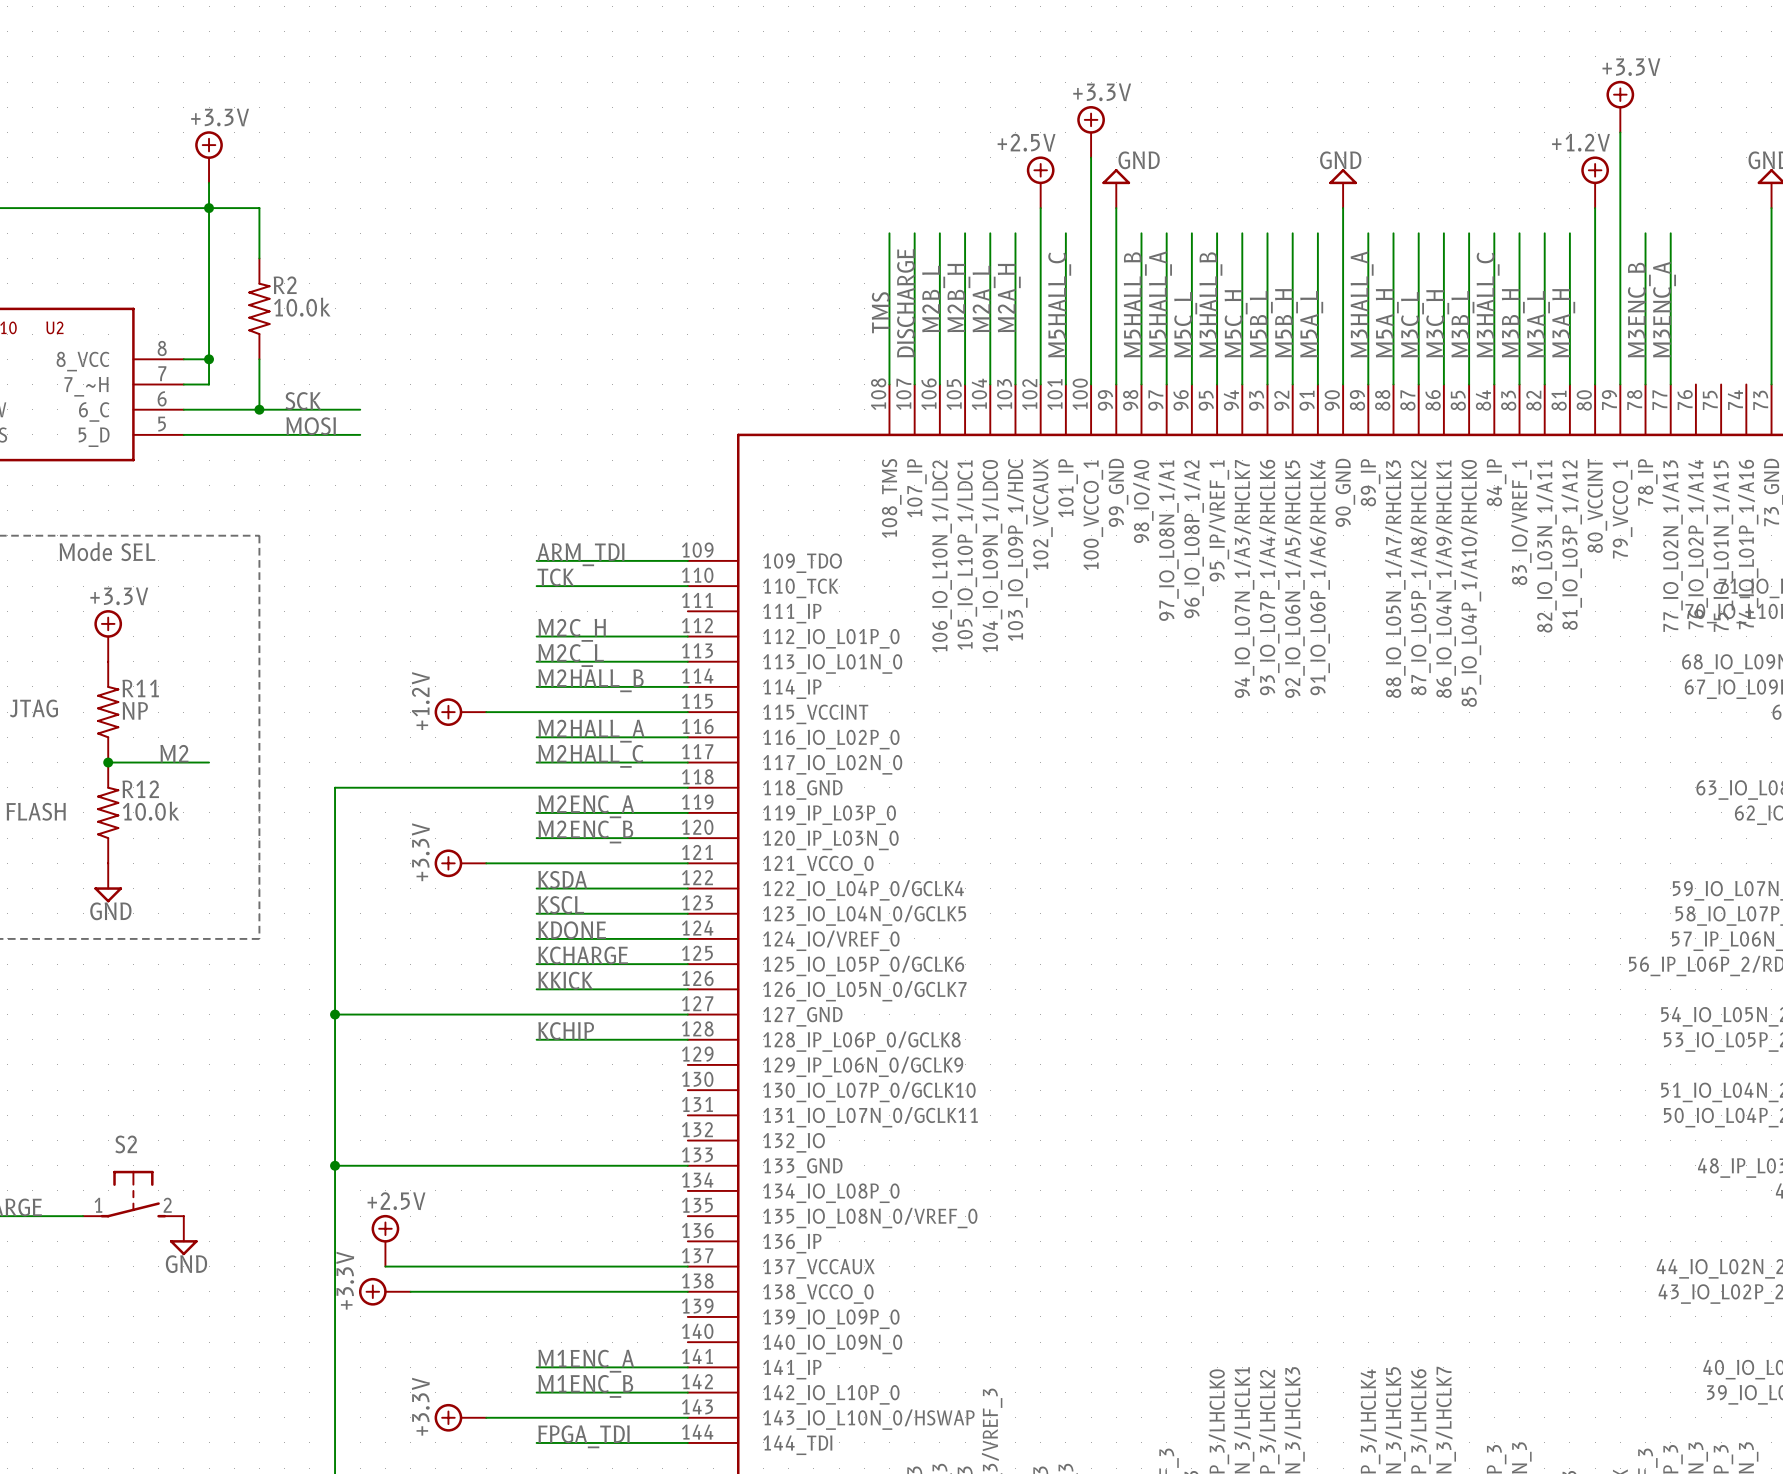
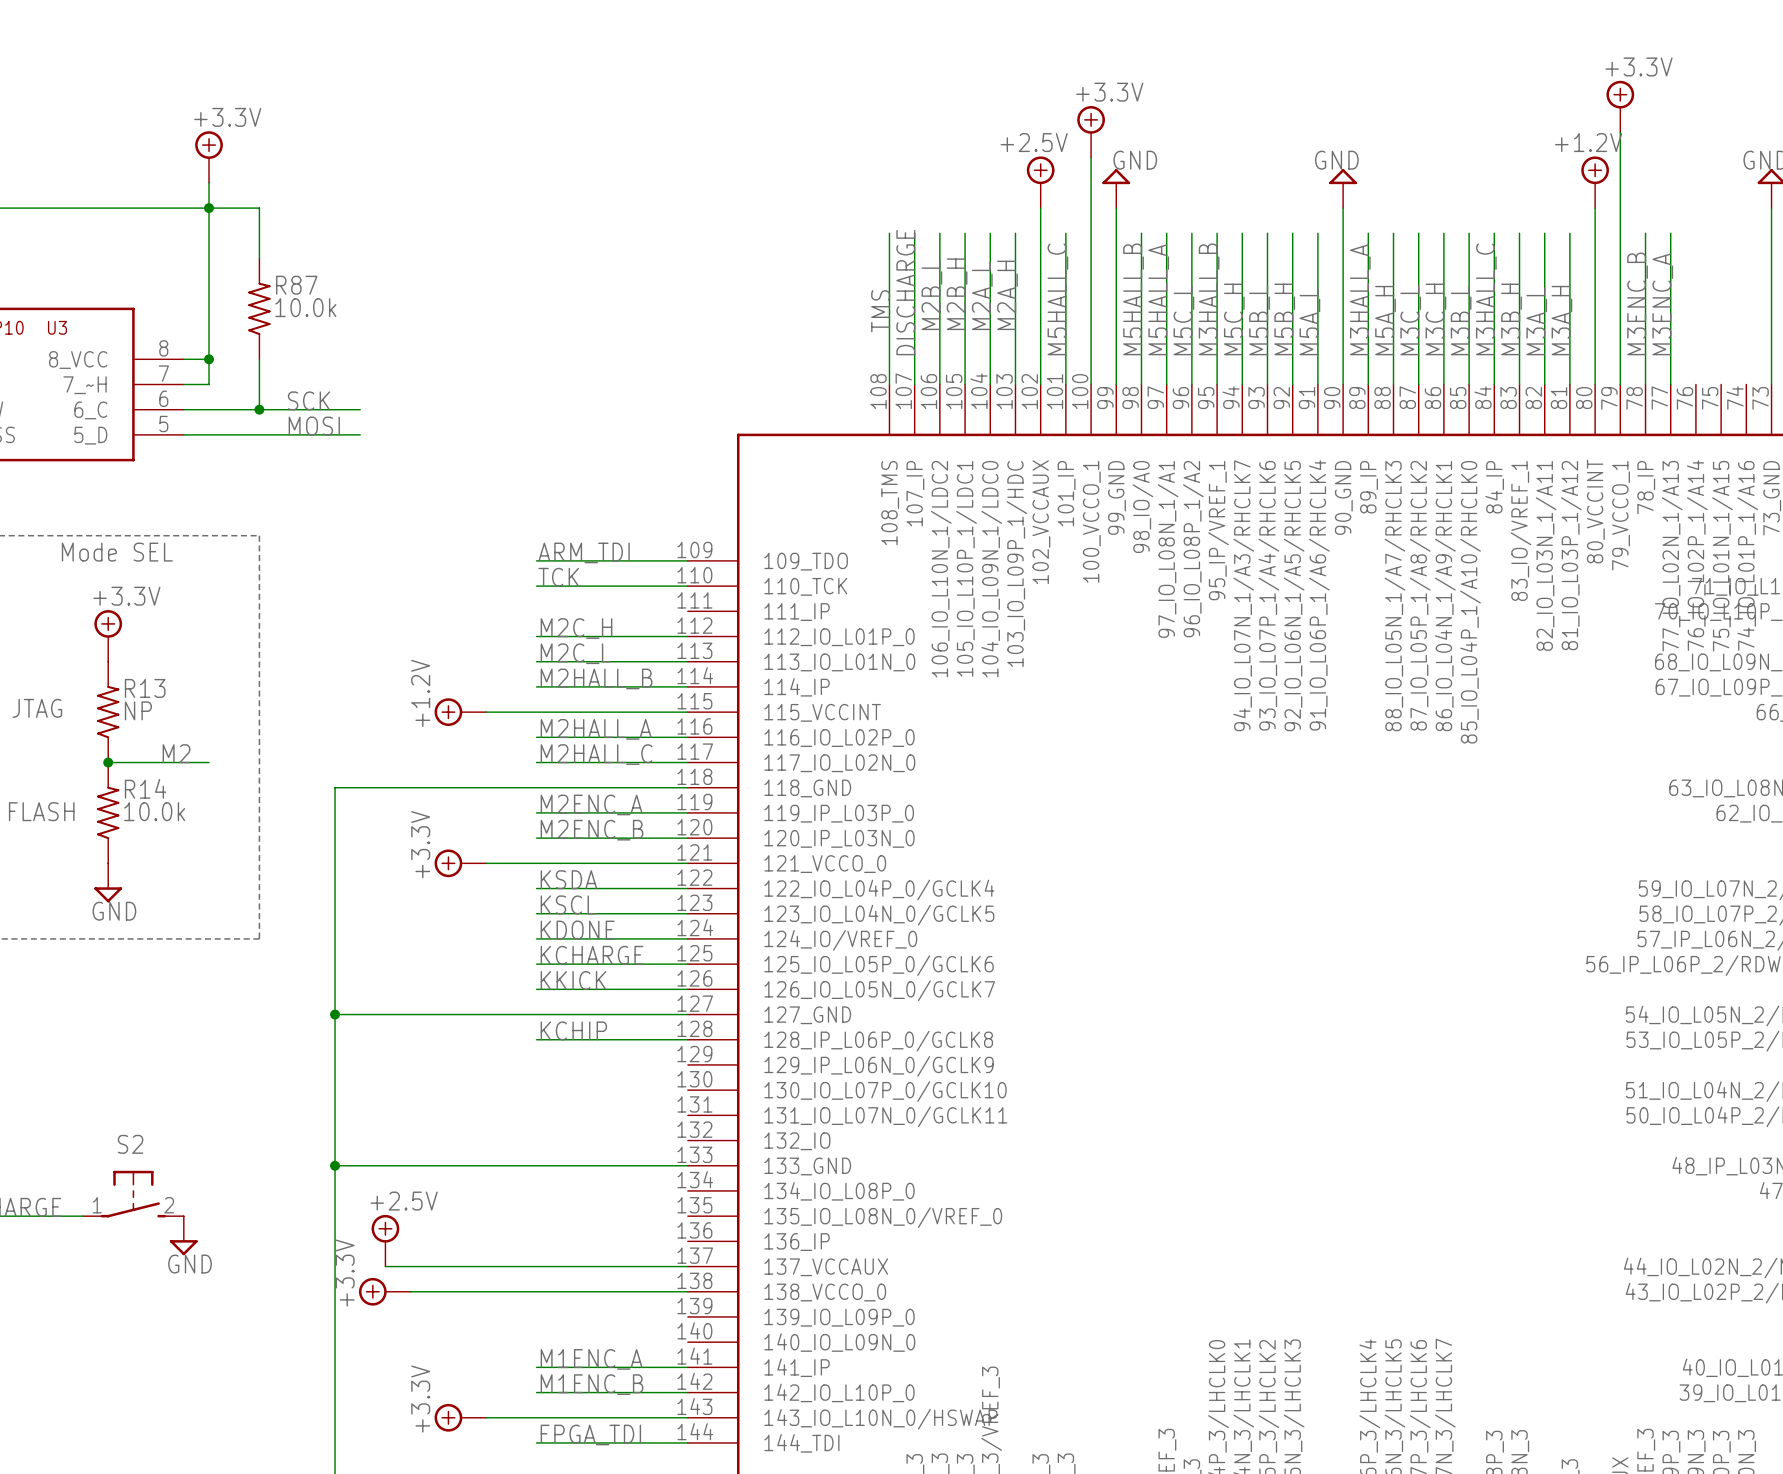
R2 name: R2 (285, 285) -> R87 (296, 285)
U2 name: U2 (54, 327) -> U3 (57, 327)
R11 name: R11 (140, 688) -> R13 (145, 688)
R12 name: R12 (140, 789) -> R14 (145, 788)

